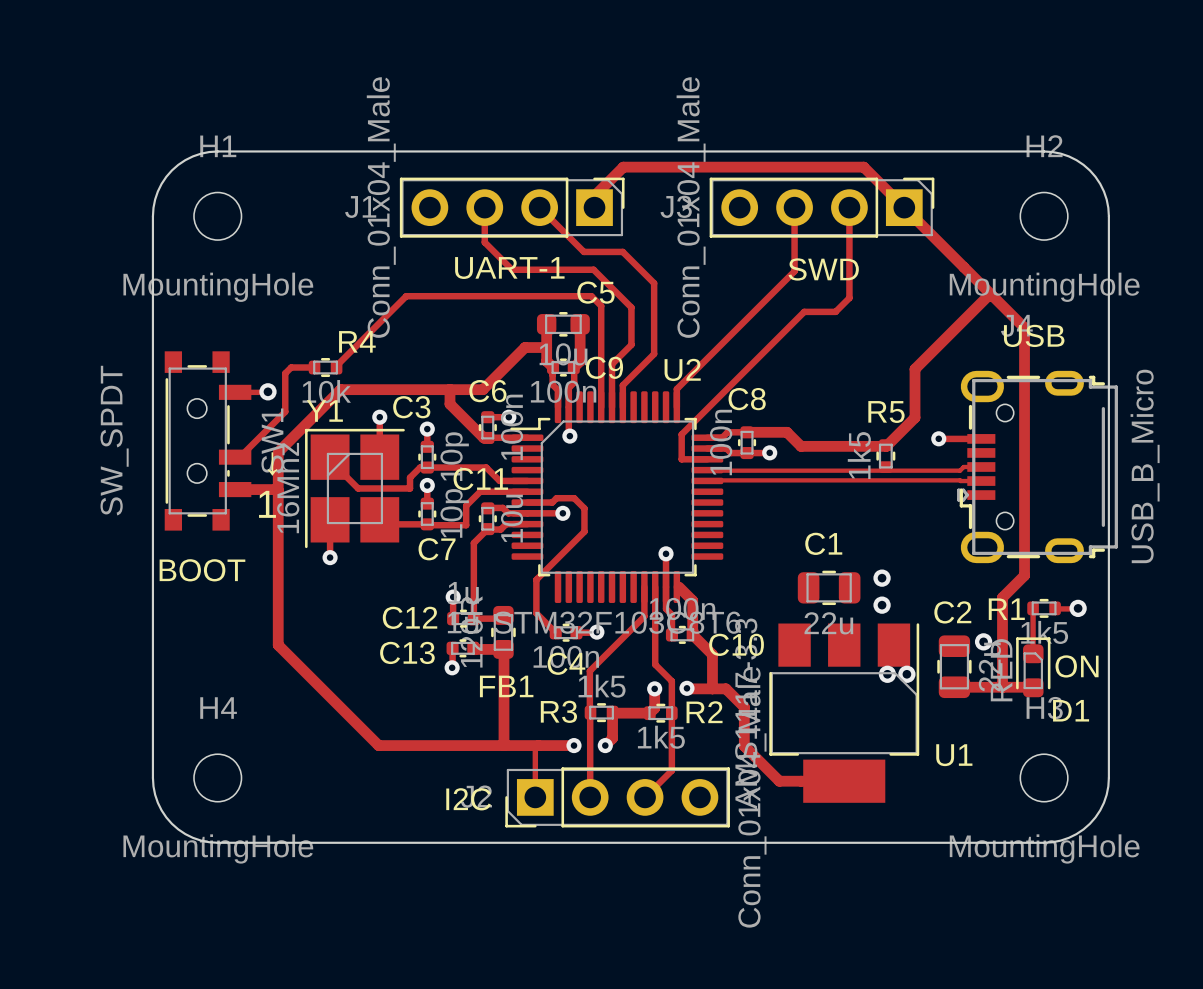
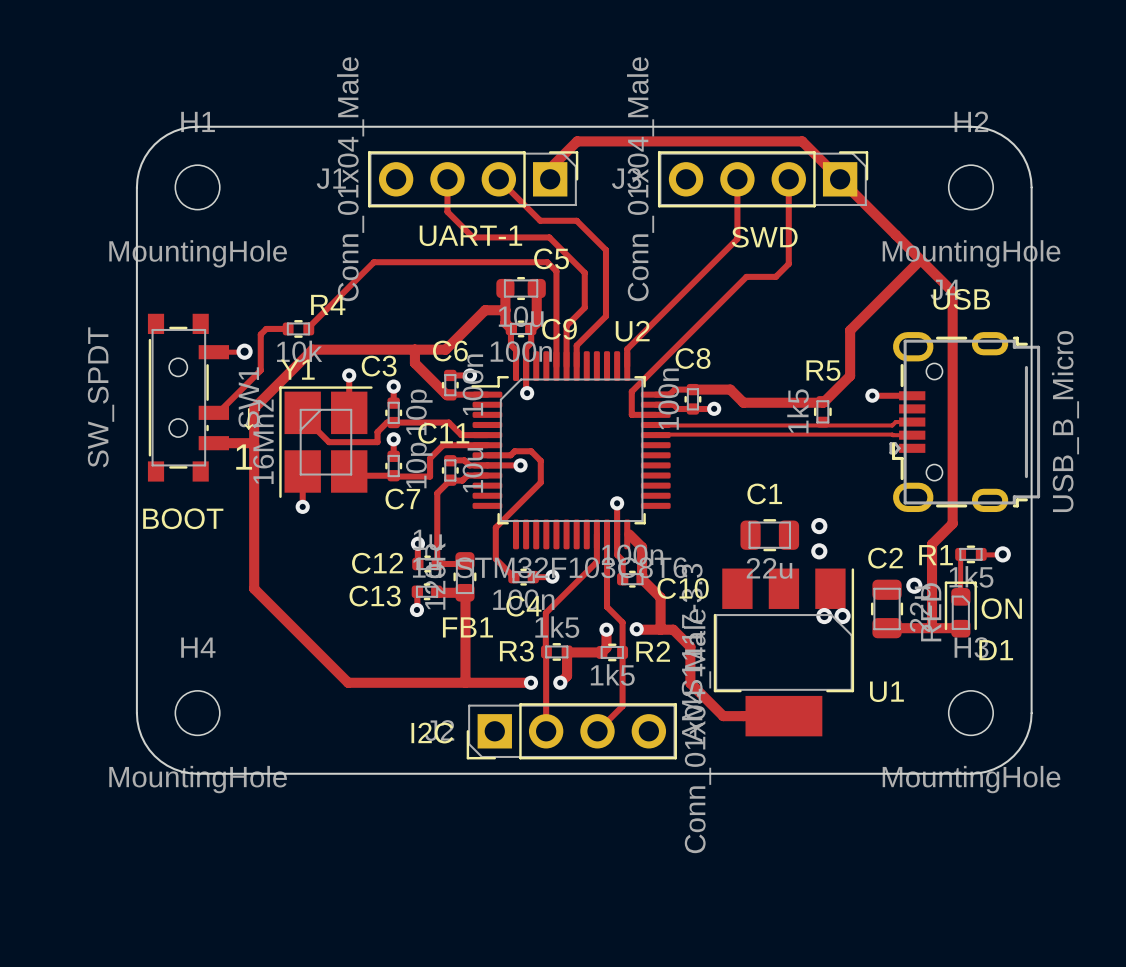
track: (538, 745) (535, 748) (535, 797) -> none

